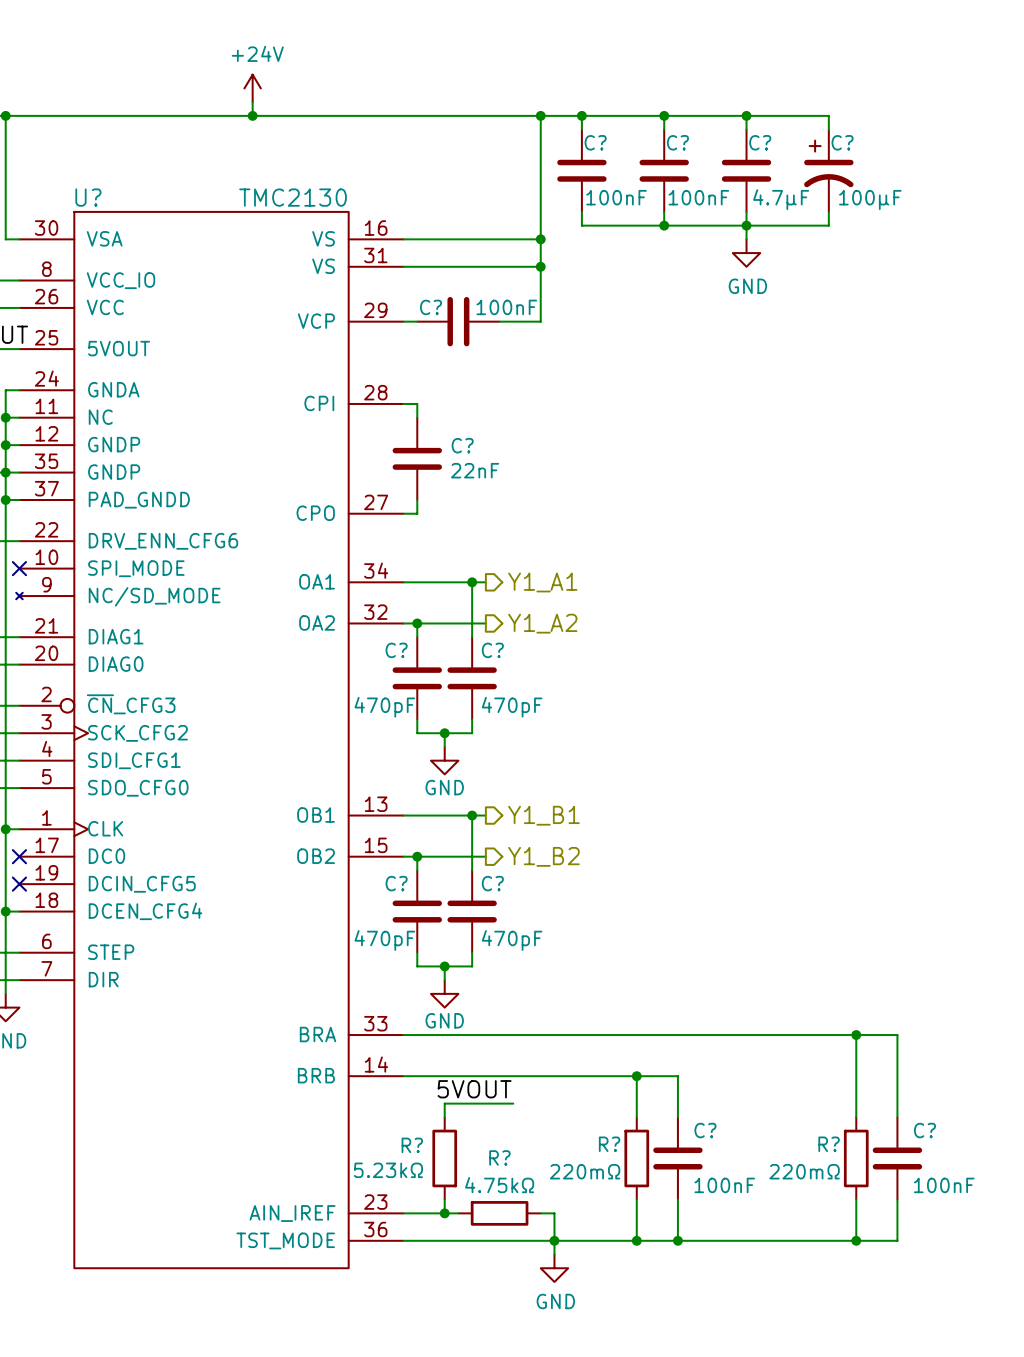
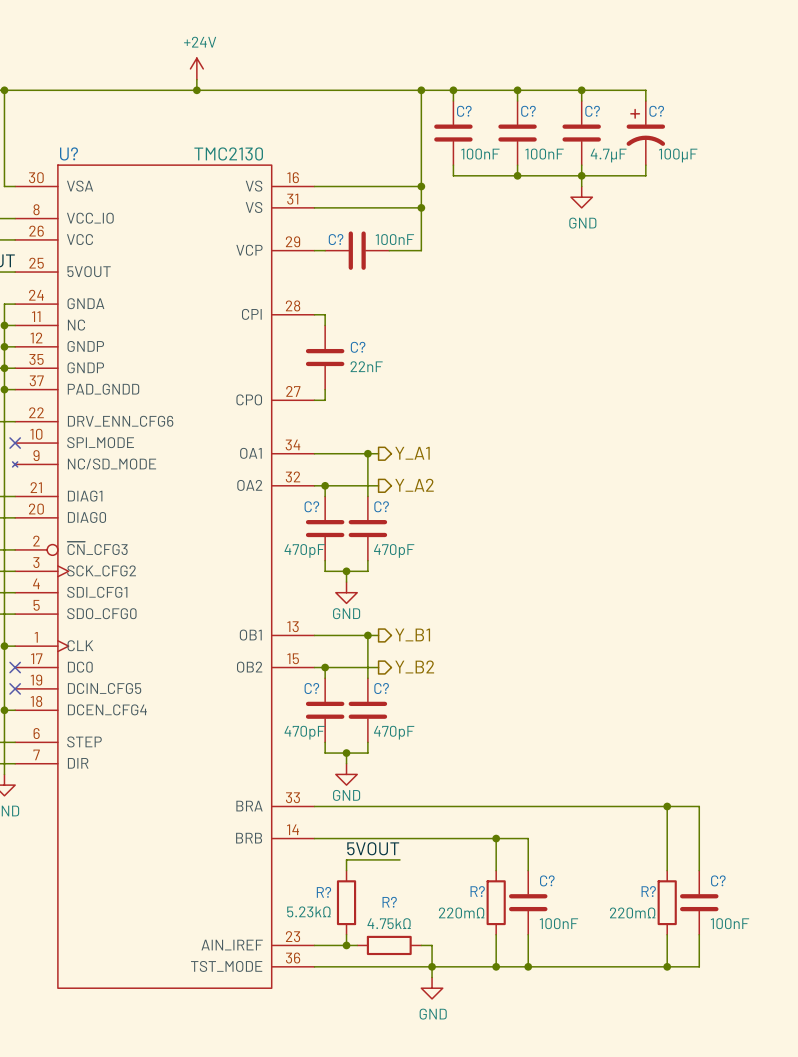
hierarchical label: Y1_A1 (542, 582) -> Y_A1 (412, 453)
hierarchical label: Y1_A2 (542, 623) -> Y_A2 (414, 485)
hierarchical label: Y1_B1 (543, 815) -> Y_B1 (412, 634)
hierarchical label: Y1_B2 (543, 856) -> Y_B2 (414, 666)

